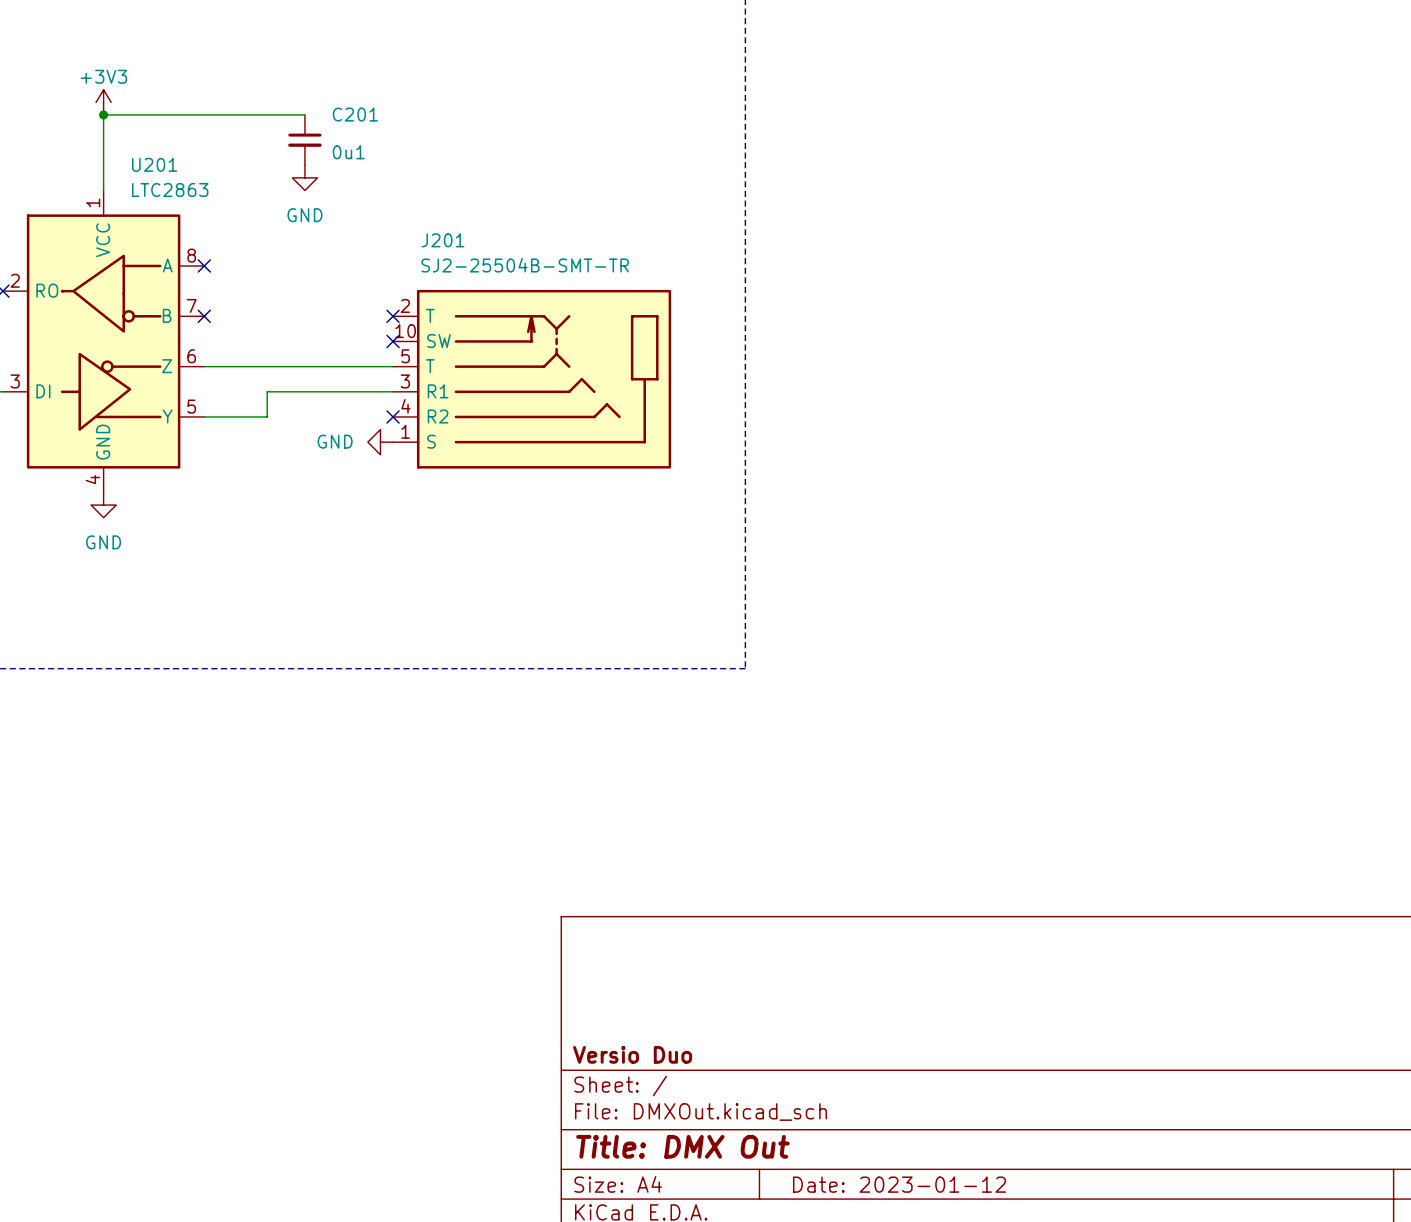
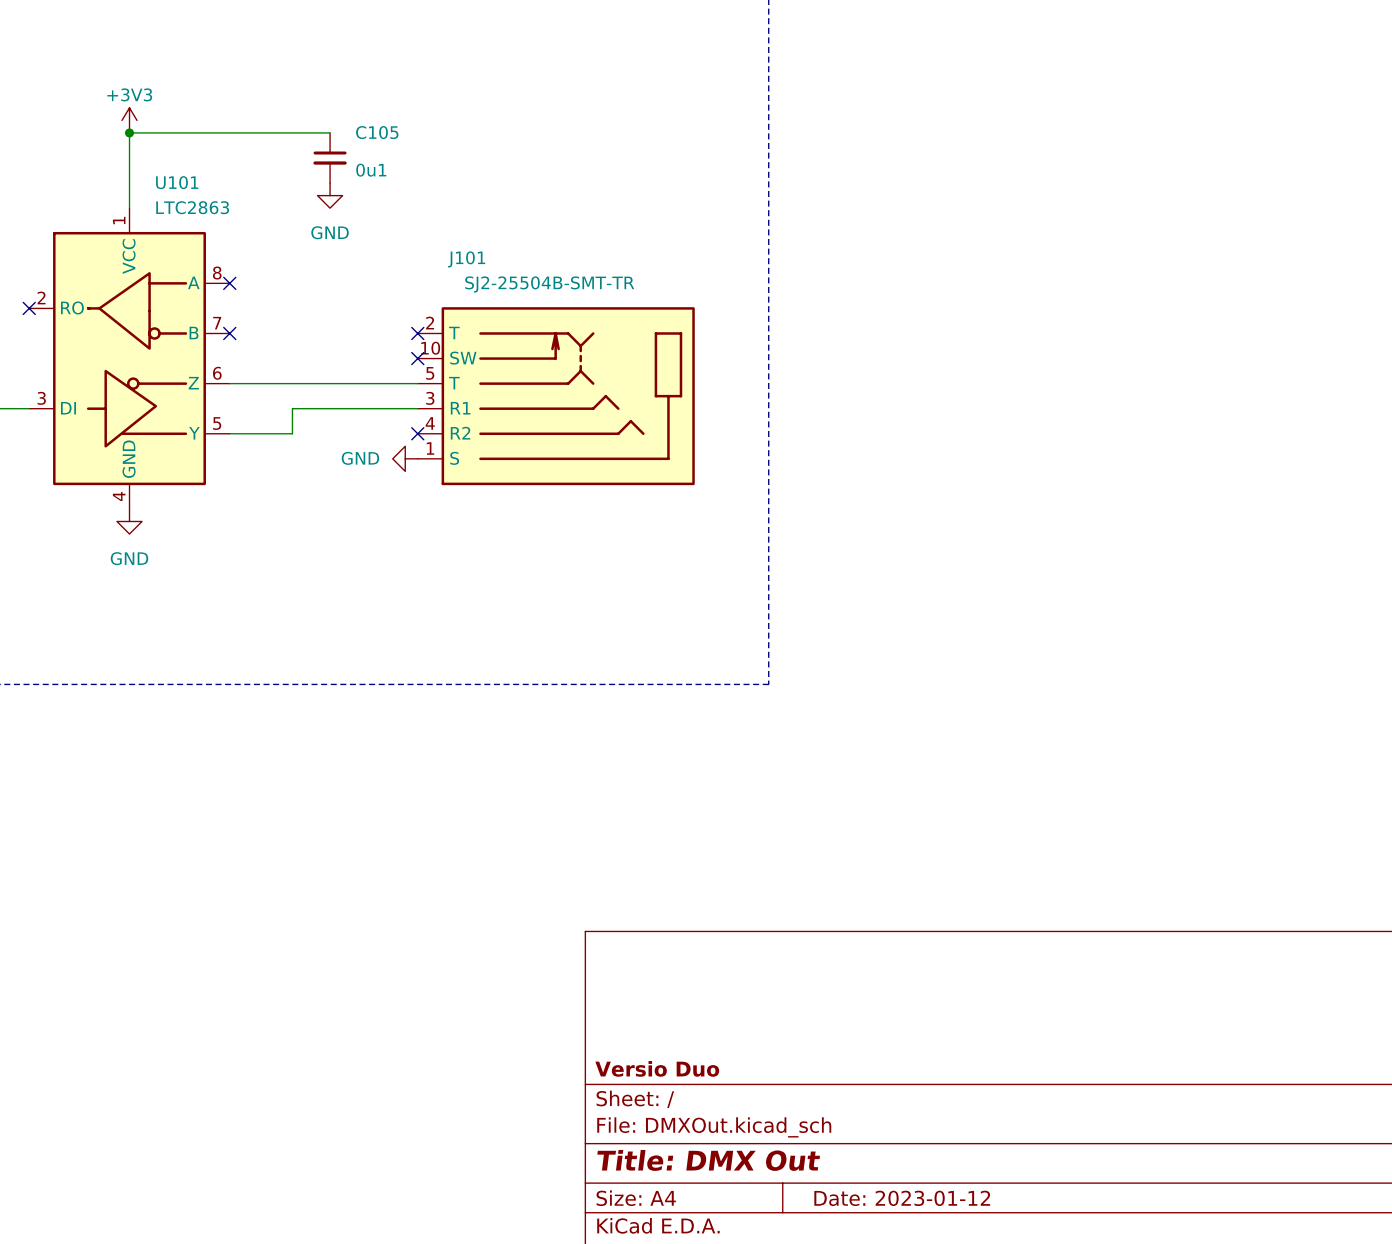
C201 name: C201 (355, 114) -> C105 (377, 132)
U201 name: U201 (154, 164) -> U101 (177, 182)
J201 name: J201 (443, 240) -> J101 (466, 259)

